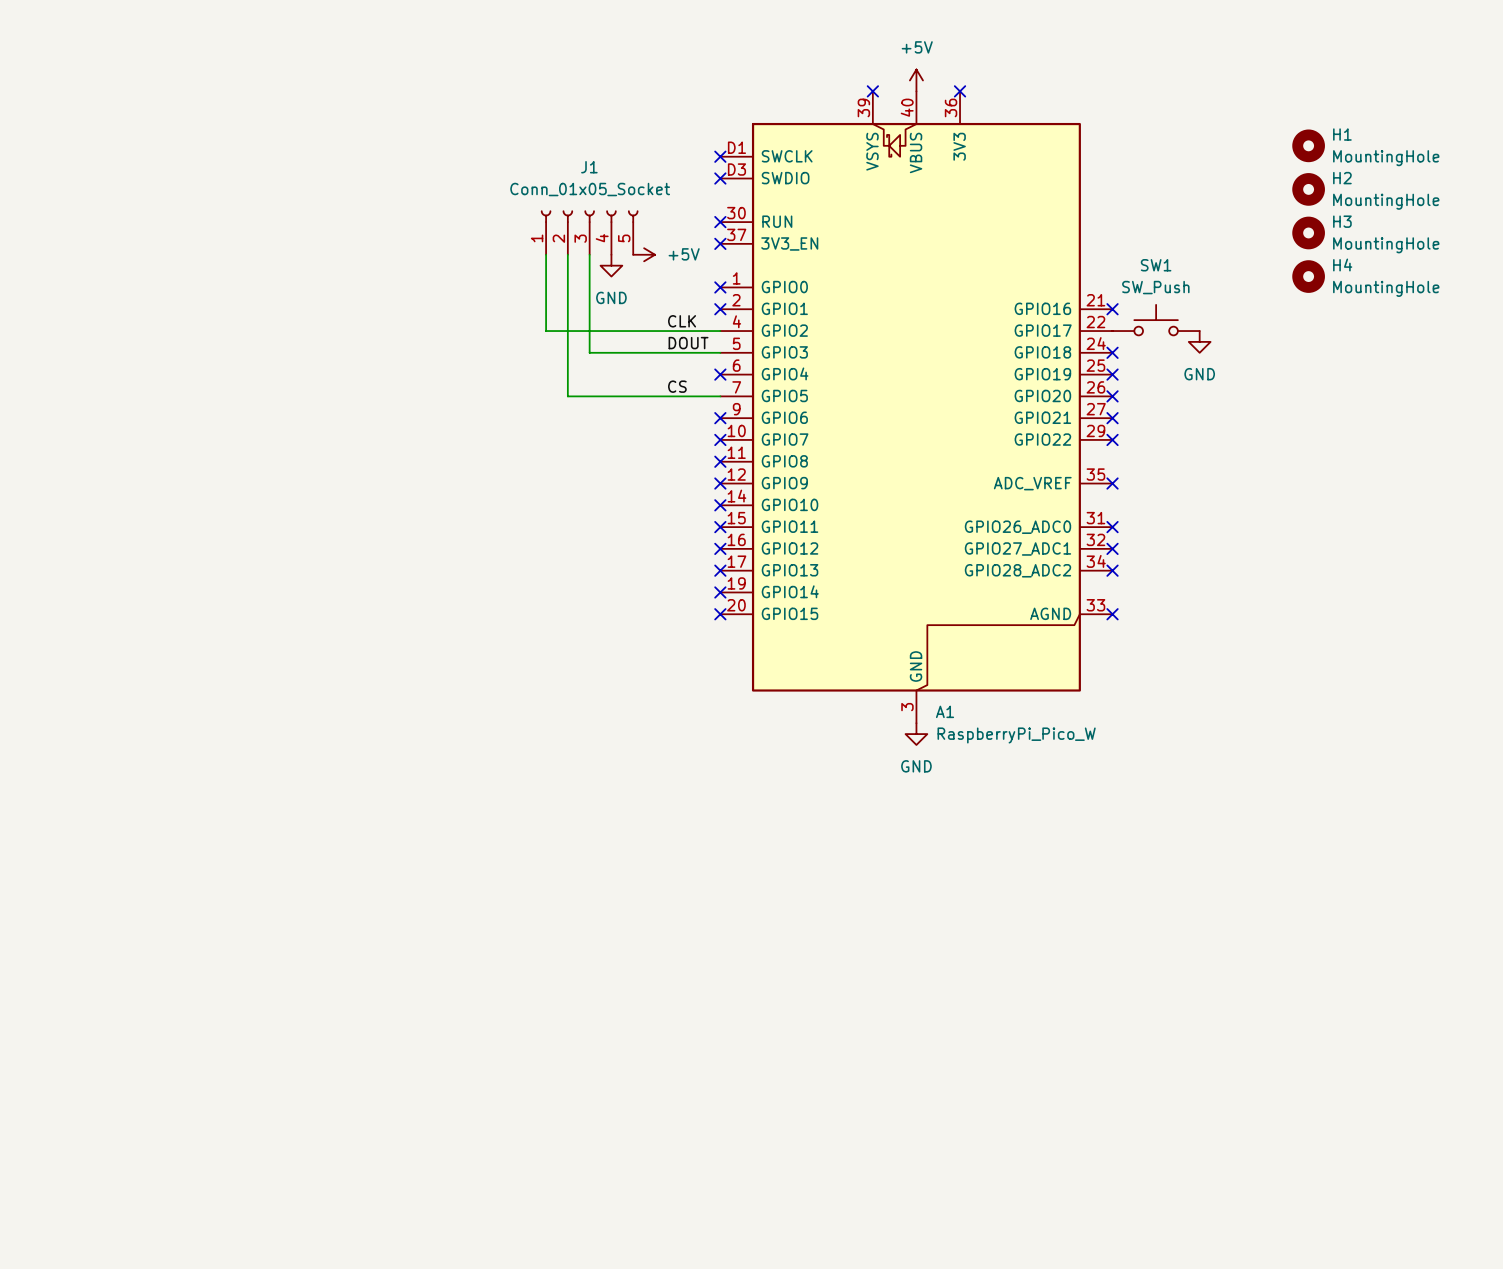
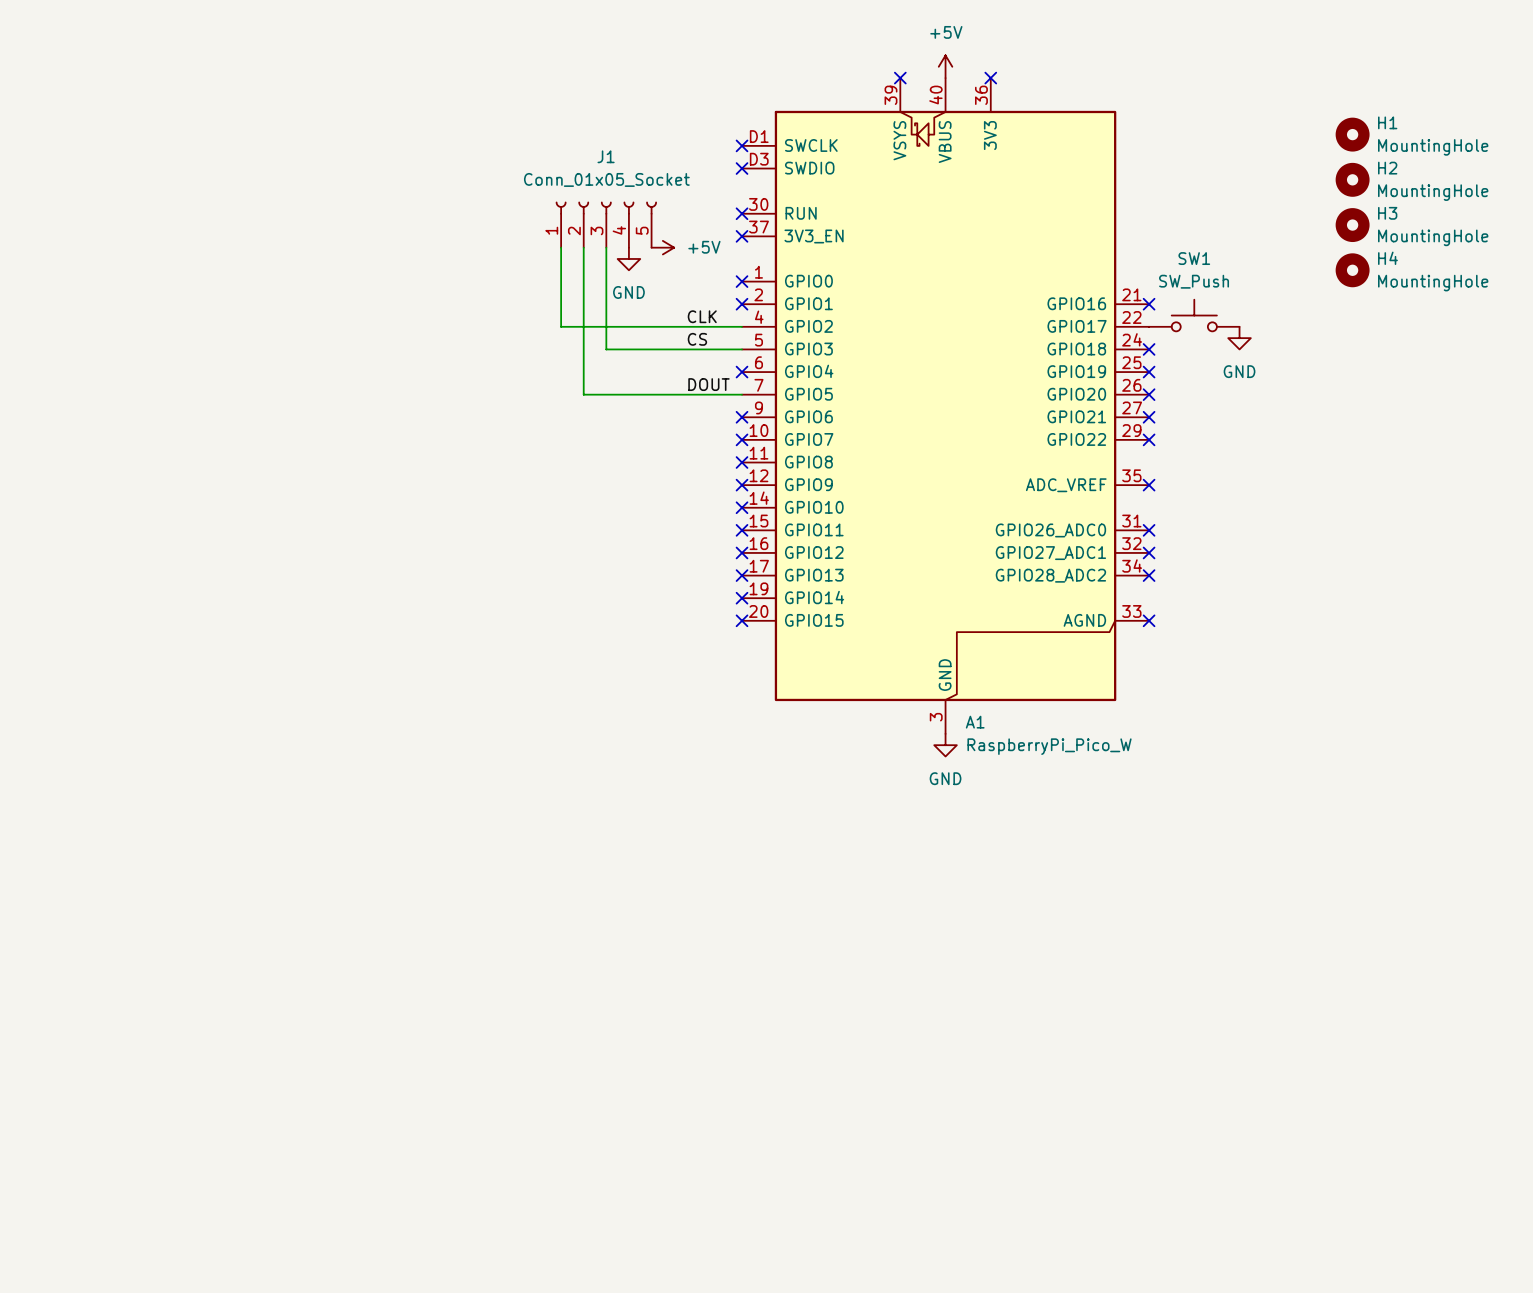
label: DOUT (688, 343) -> CS (697, 339)
label: CS (677, 386) -> DOUT (708, 384)

